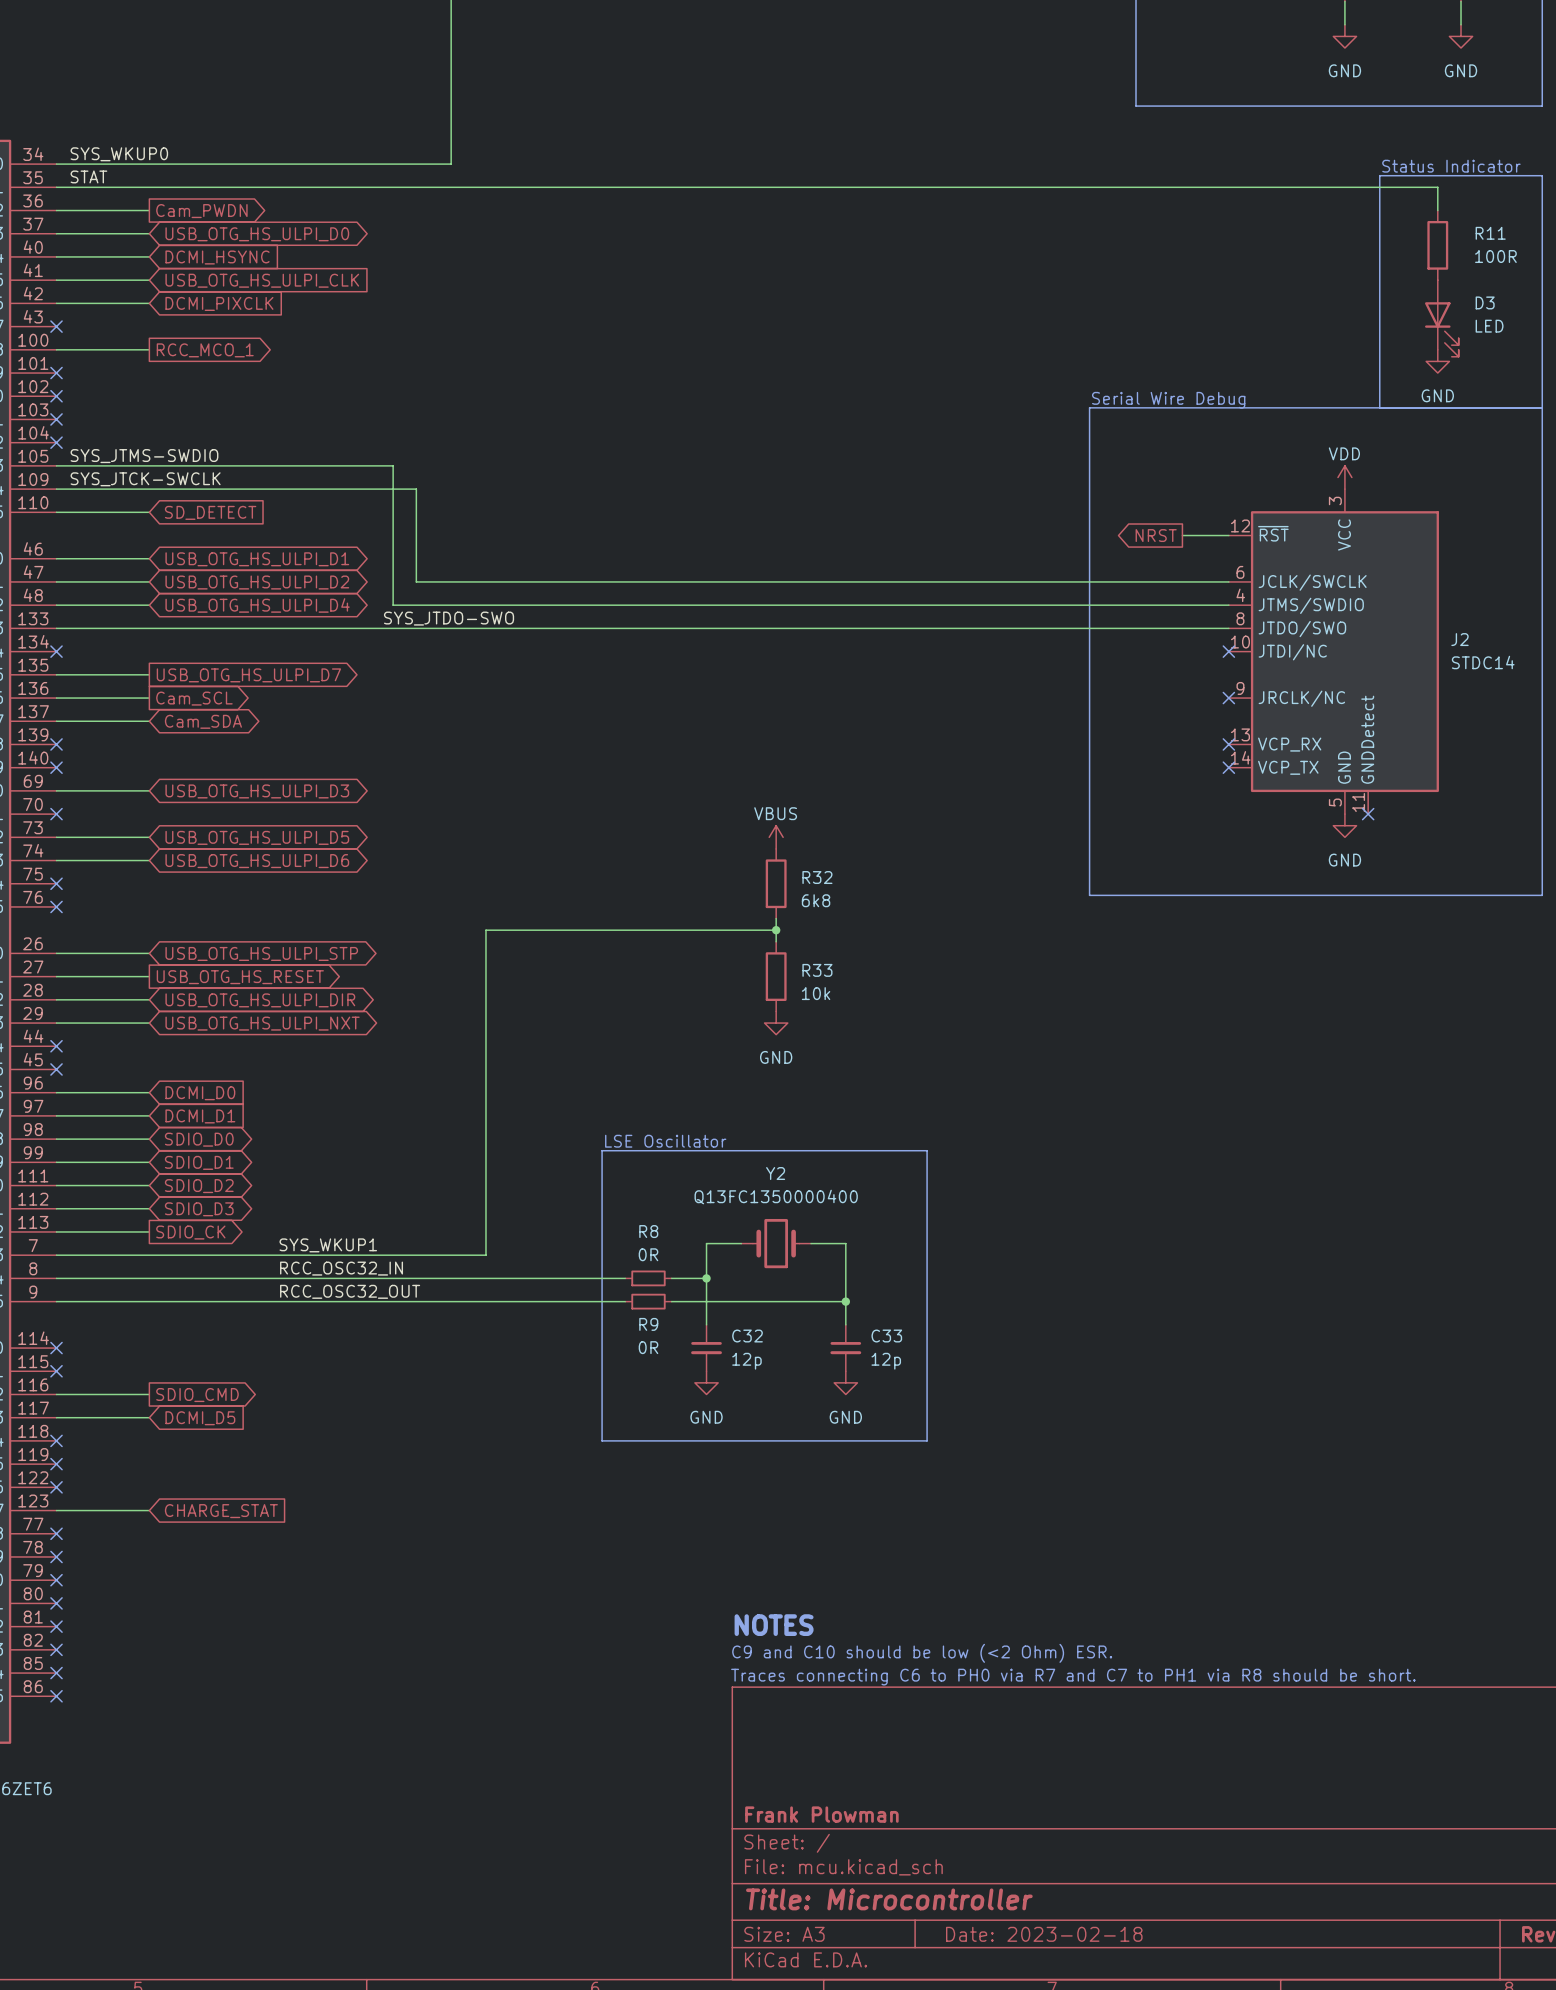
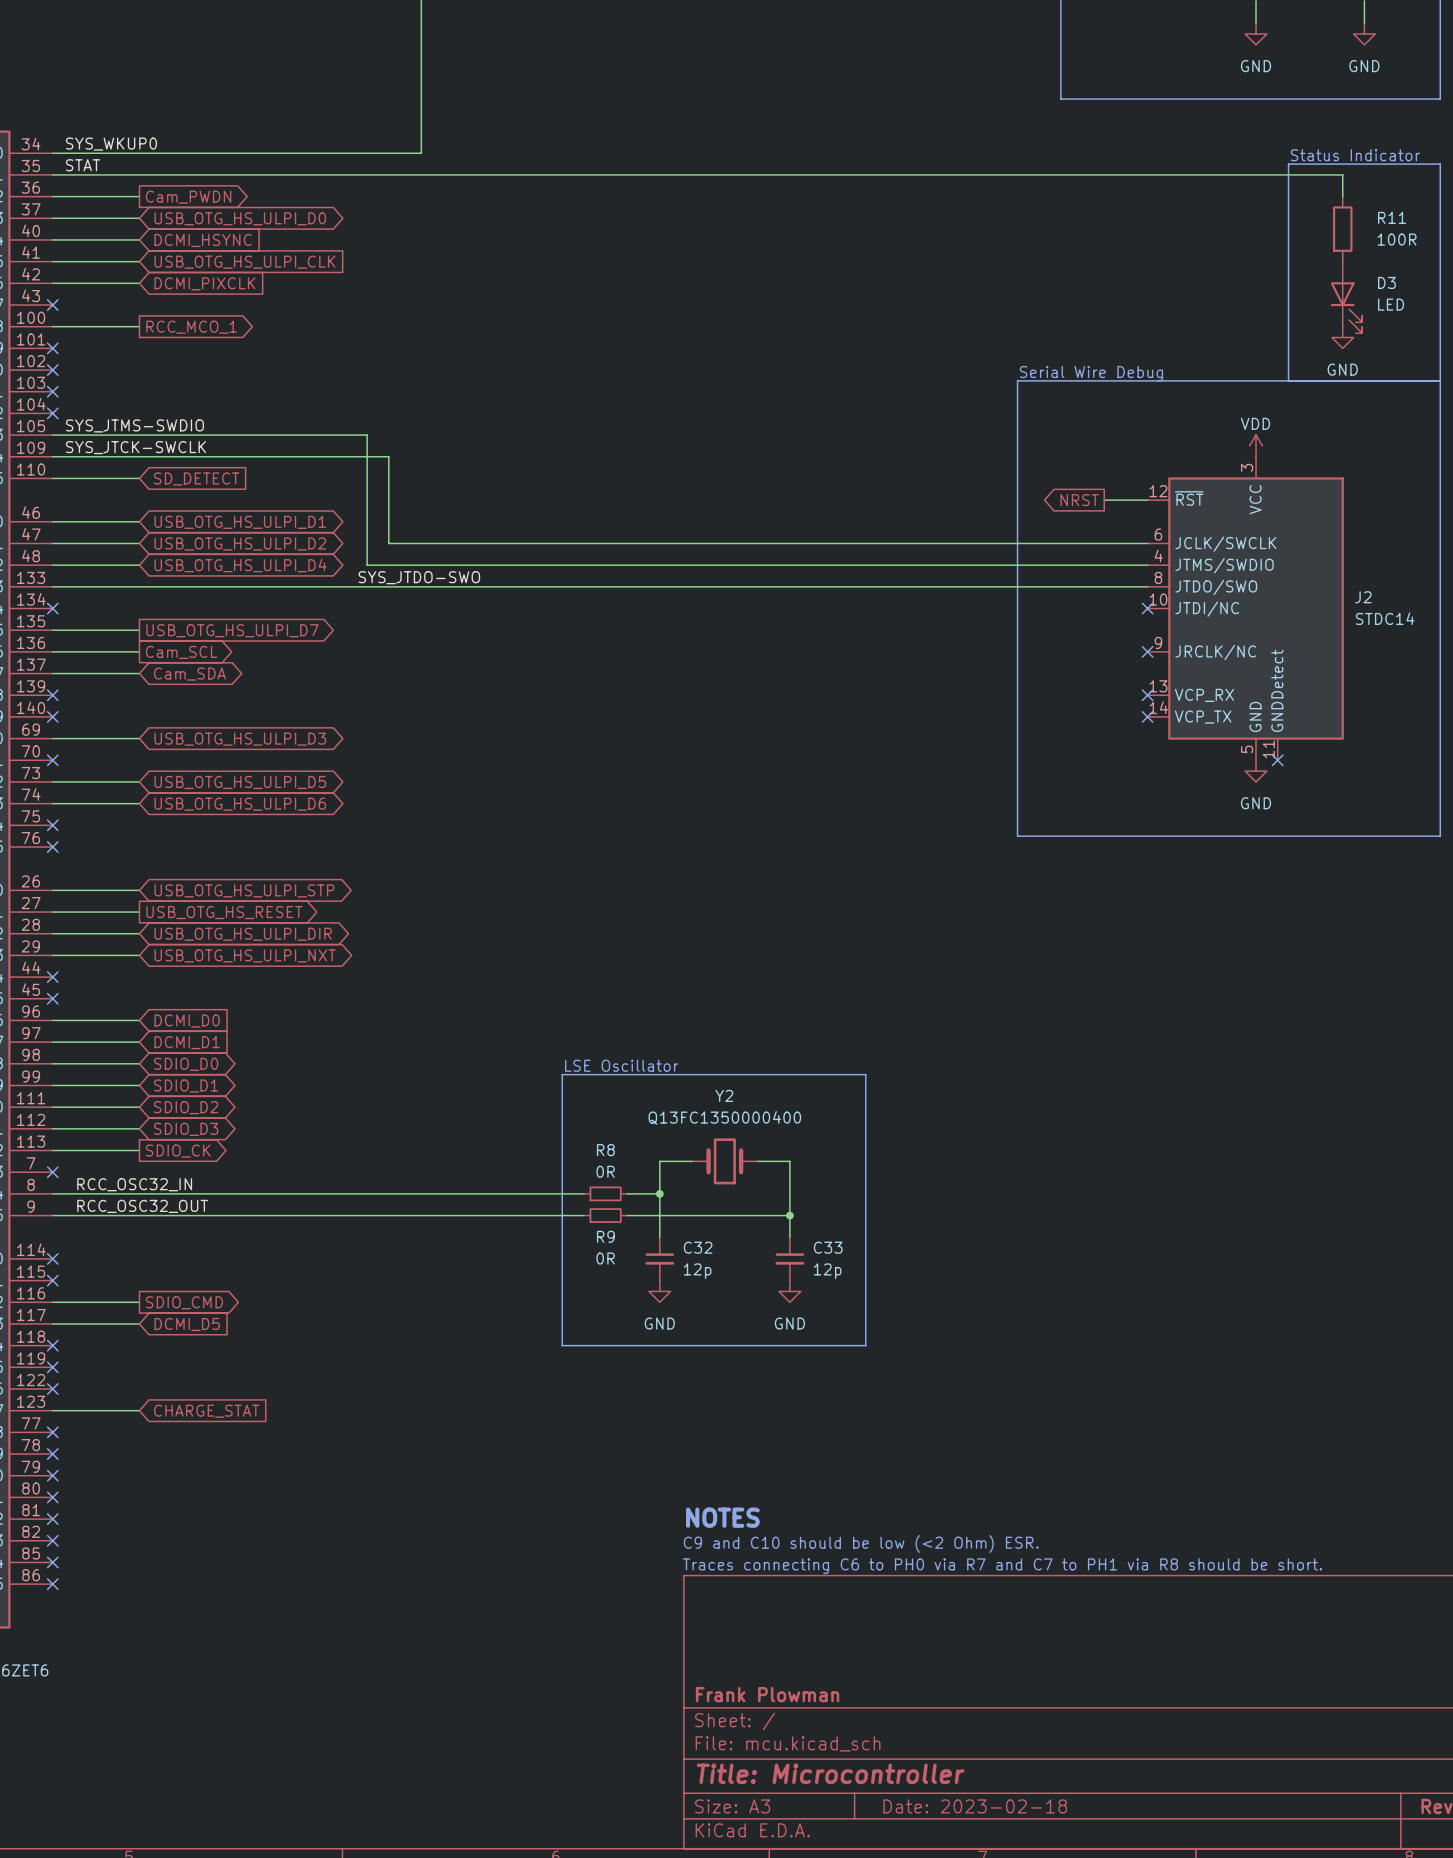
power symbol: VBUS (776, 837) -> none
R32: 6k8 (776, 883) -> none
wire: (776, 918) (776, 941) -> none
wire: (776, 930) (485, 930) (485, 1255) (56, 1255) -> none
junction: (776, 930) -> none
R33: 10k (776, 976) -> none
power symbol: GND (776, 1023) -> none
label: SYS_WKUP1 (328, 1245) -> none
no-connect mark: none -> (52, 1172)
label position: RCC_OSC32_IN (341, 1268) -> RCC_OSC32_IN (134, 1184)
label position: RCC_OSC32_OUT (350, 1291) -> RCC_OSC32_OUT (142, 1206)

